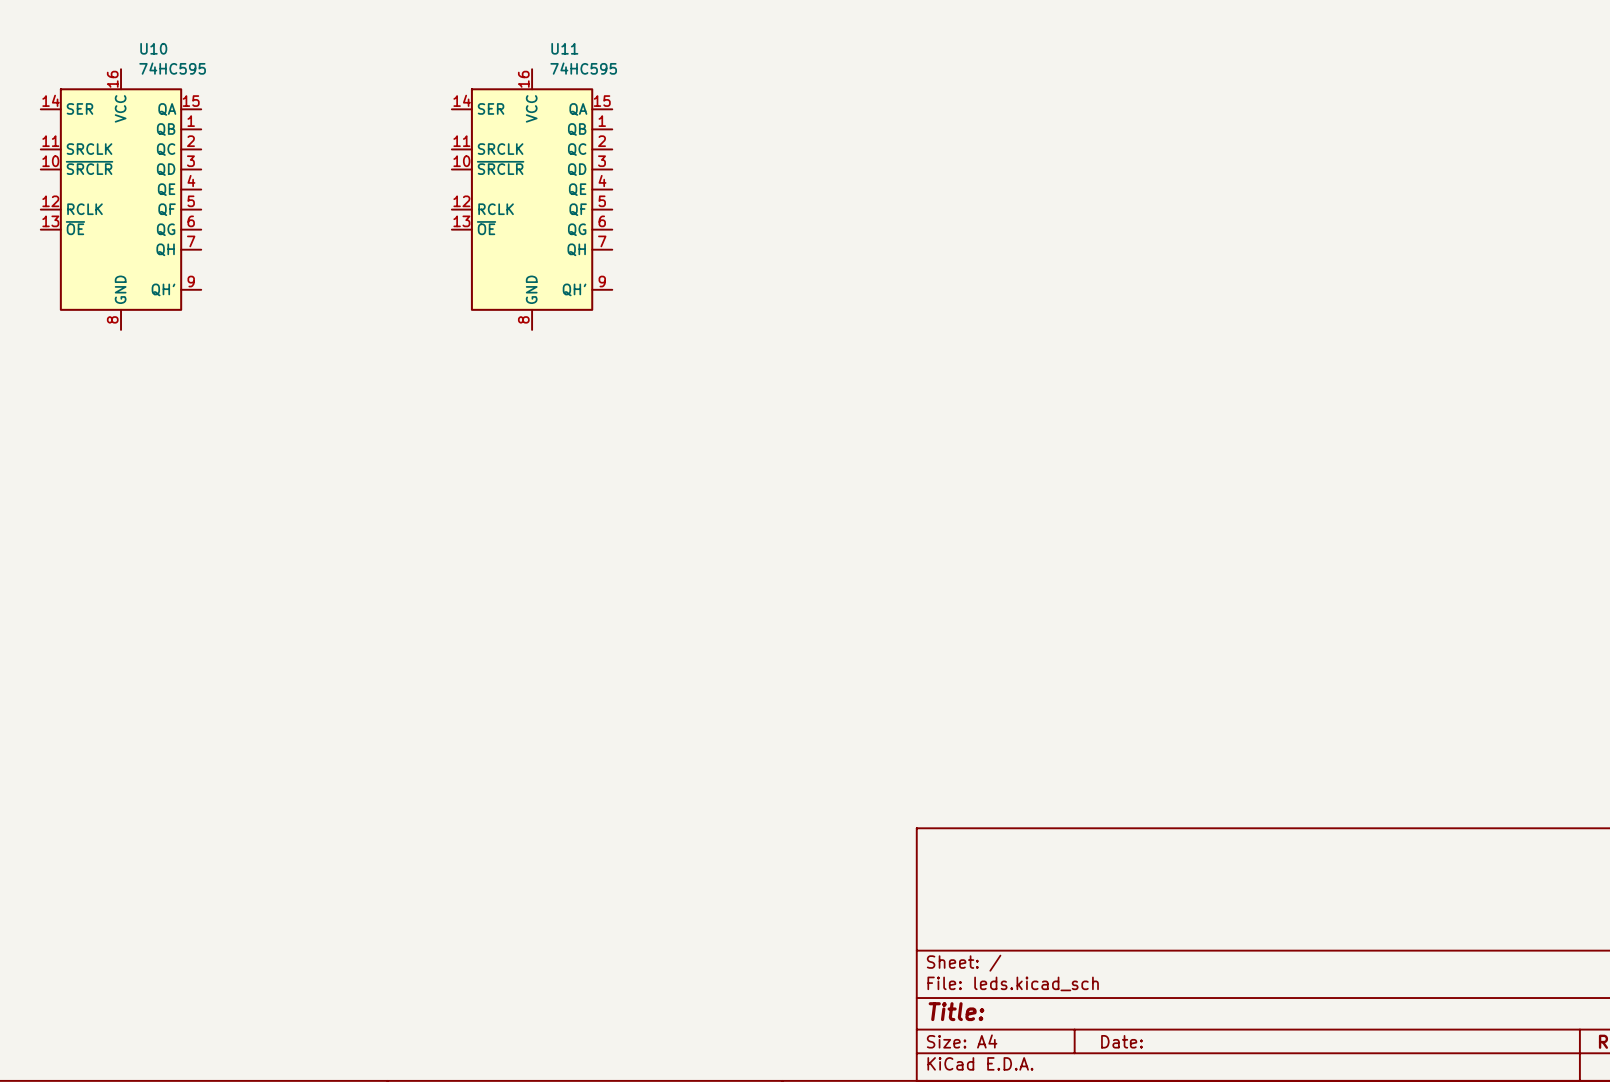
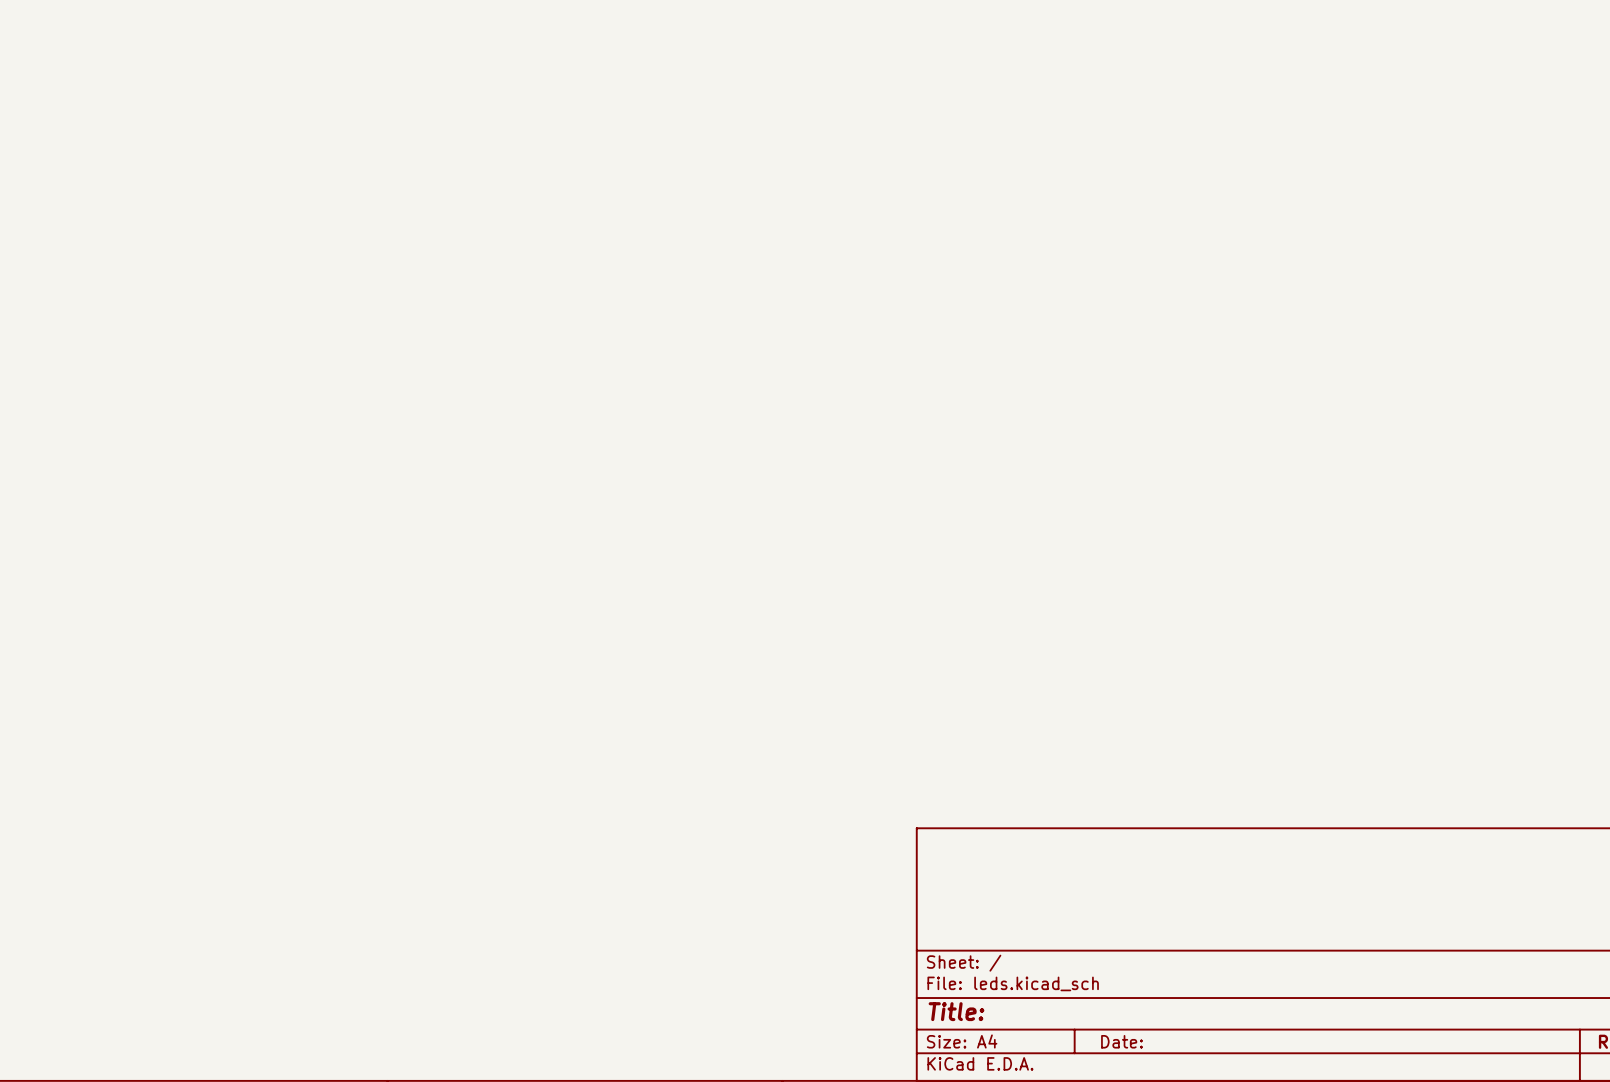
U10: 74HC595 (121, 199) -> none
U11: 74HC595 (532, 199) -> none

